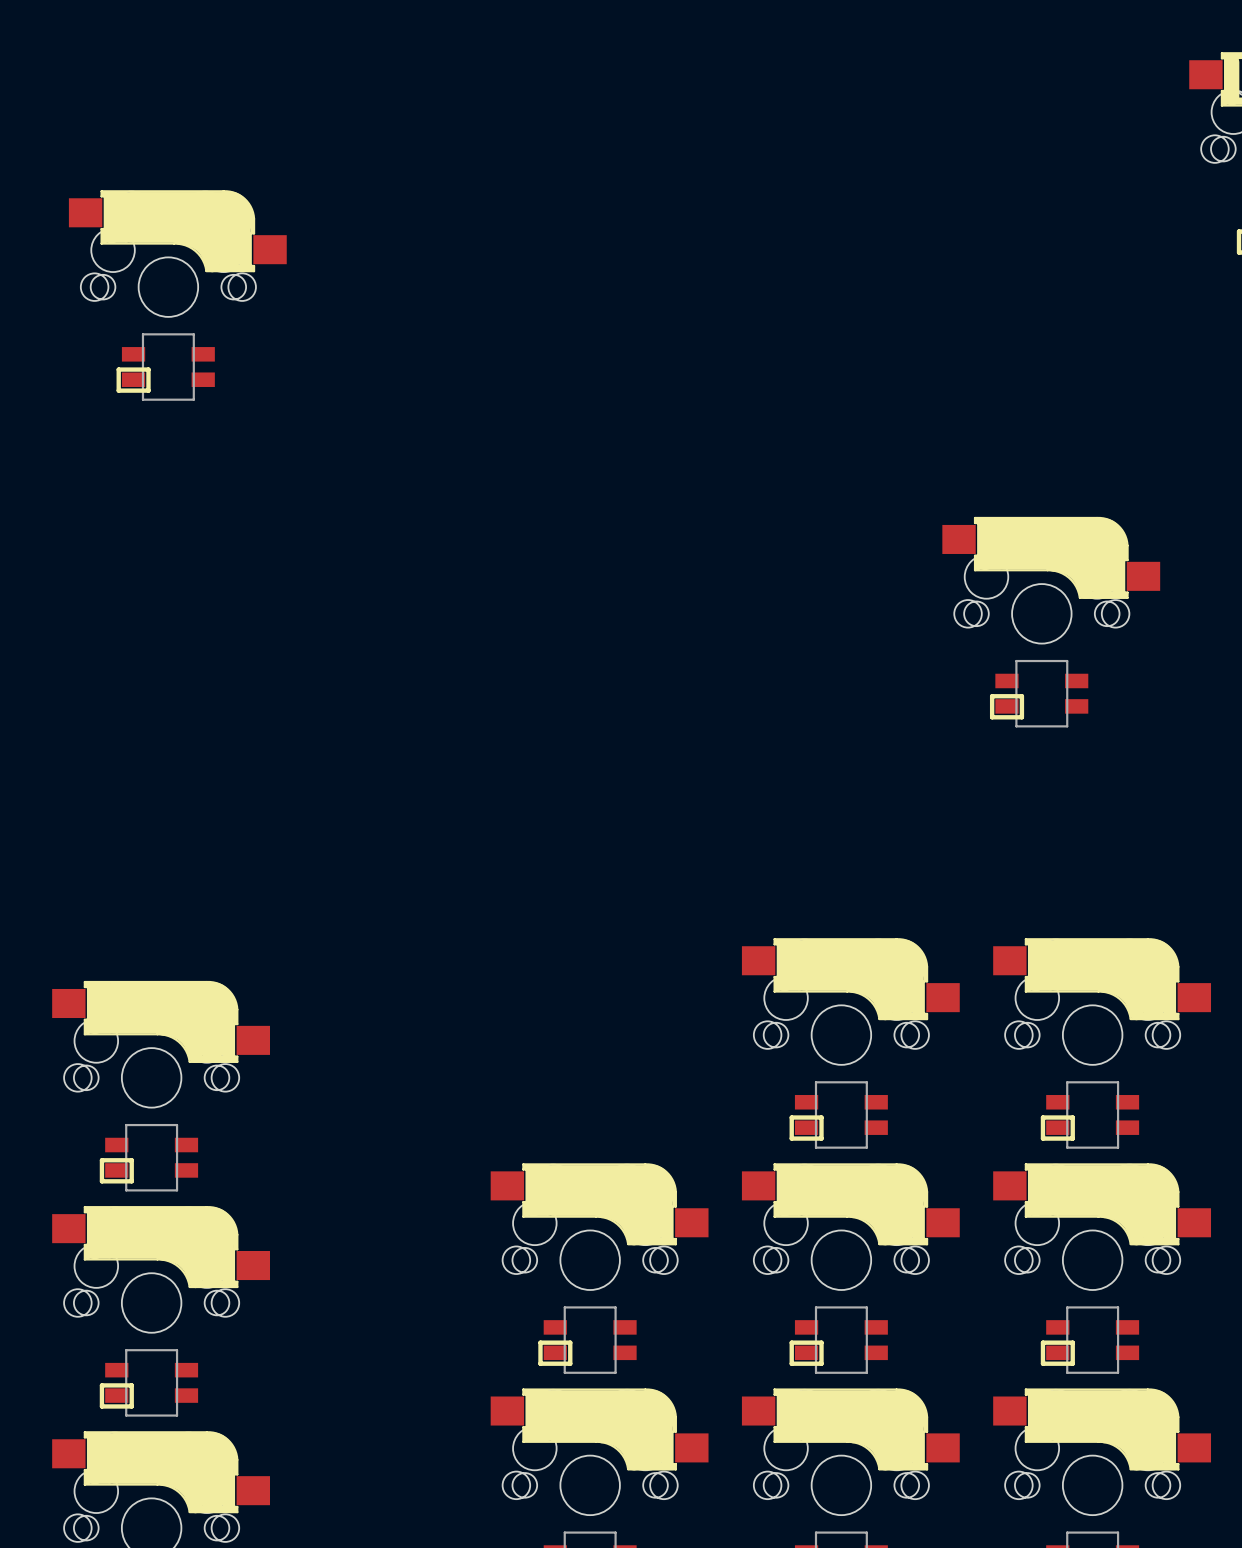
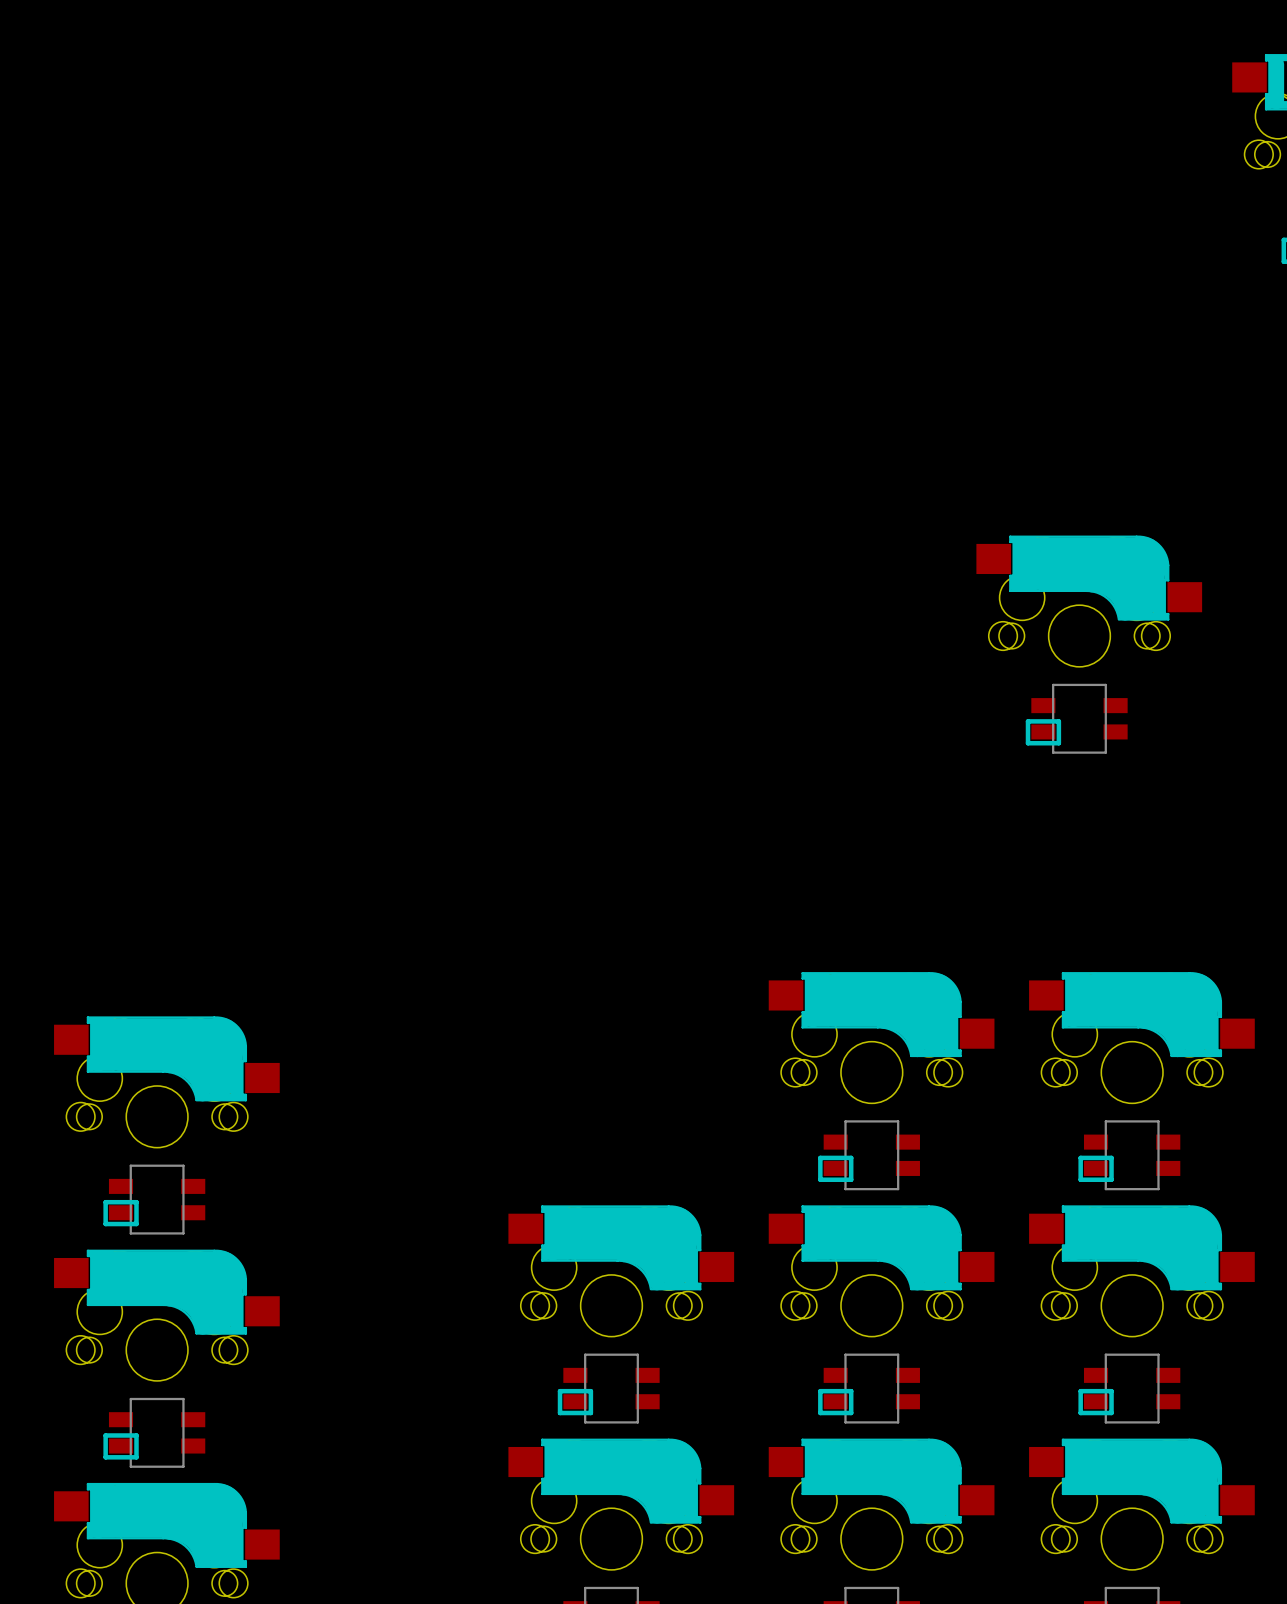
part: (177, 295) -> none

